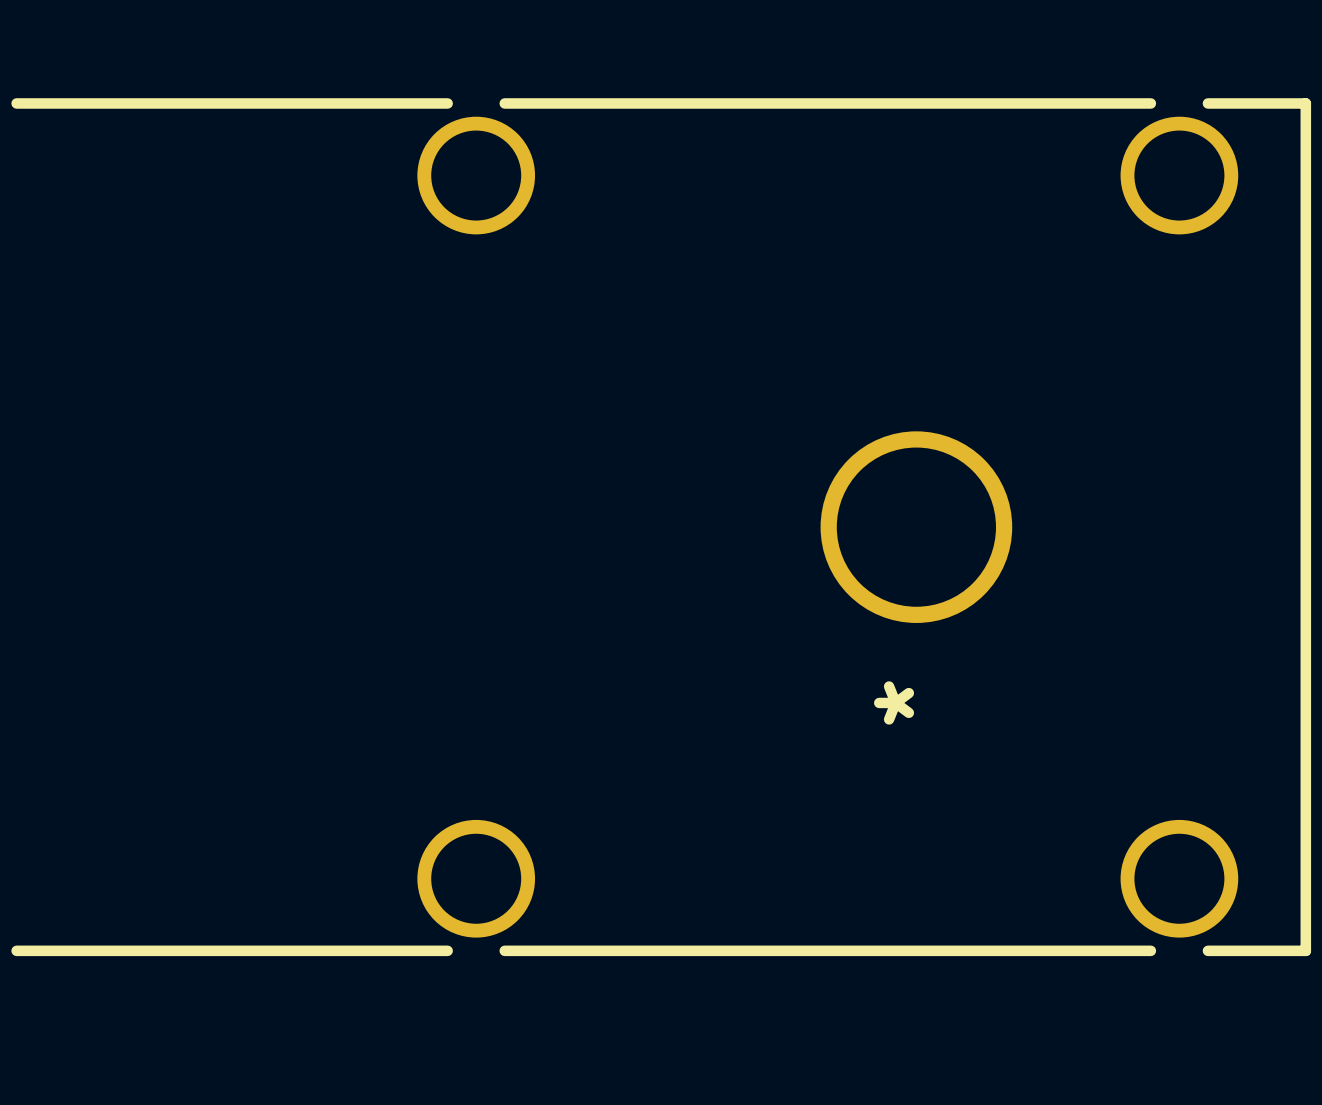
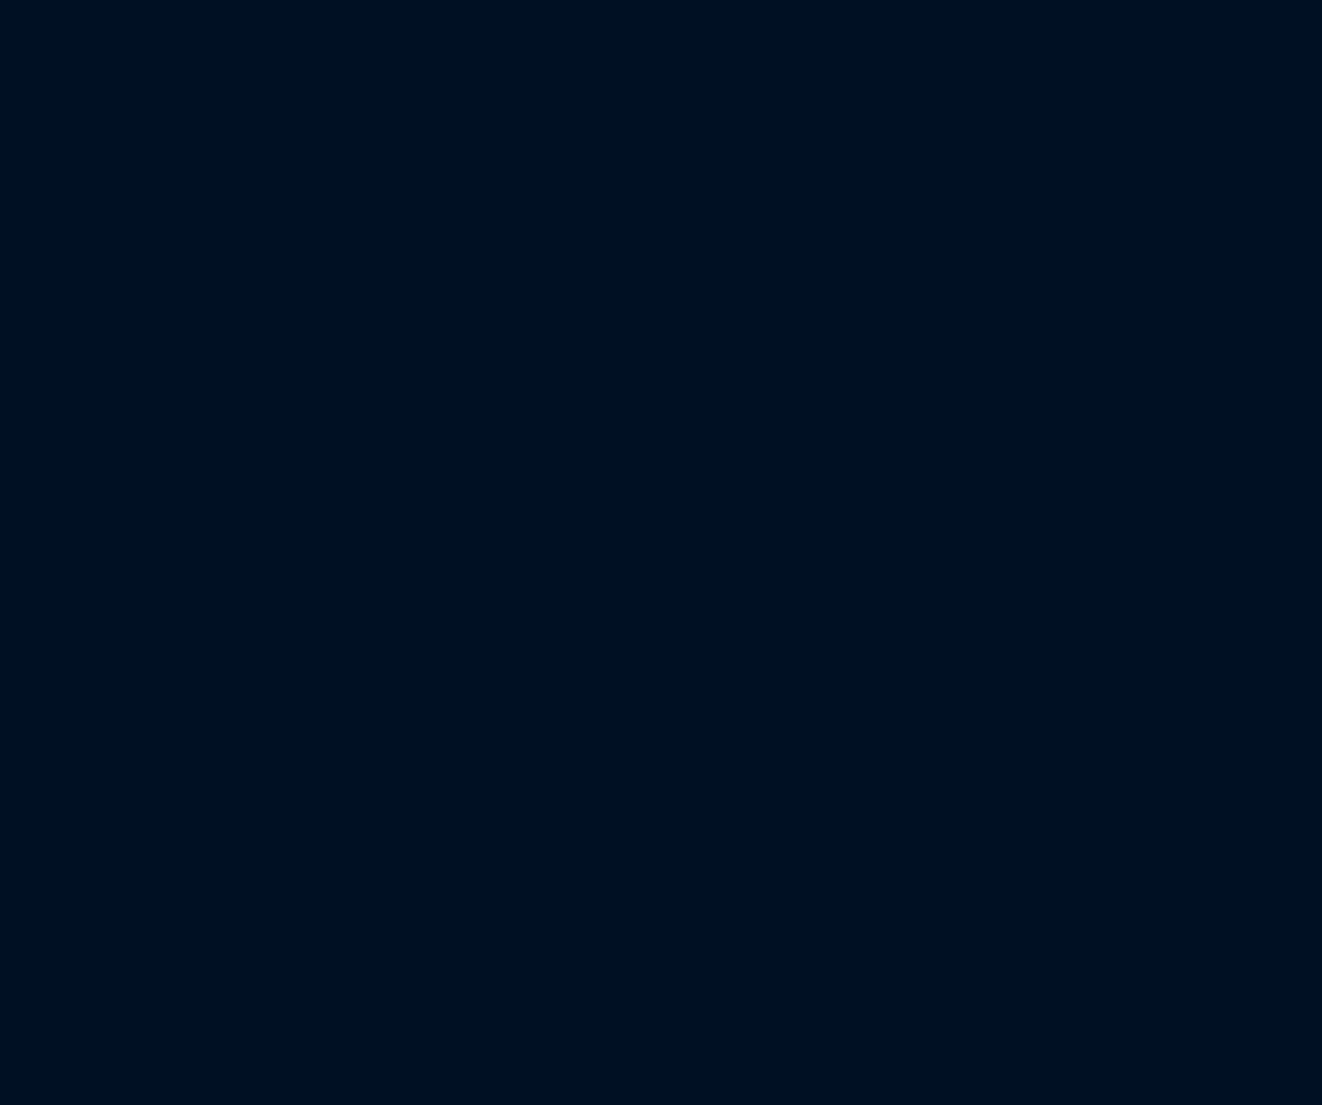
part: (661, 527) -> none

